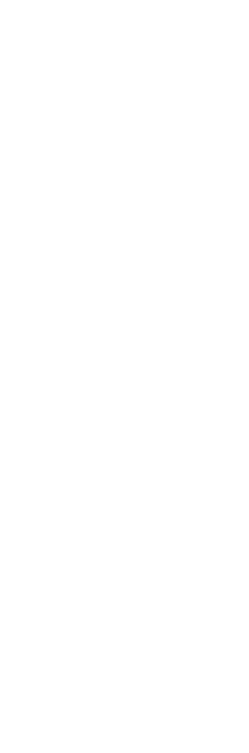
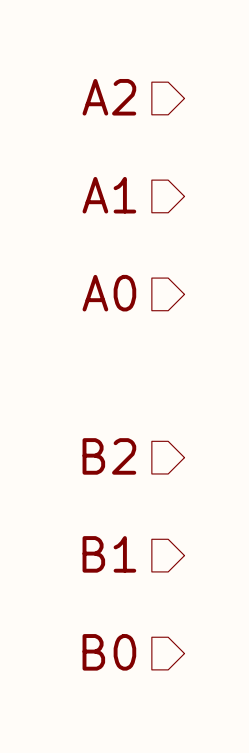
hierarchical label: none -> A2 (109, 97)
hierarchical label: none -> A1 (109, 195)
hierarchical label: none -> A0 (109, 293)
hierarchical label: none -> B2 (109, 456)
hierarchical label: none -> B1 (109, 554)
hierarchical label: none -> B0 (109, 652)

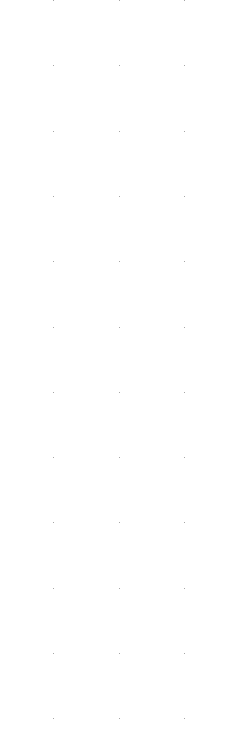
hierarchical label: A2 (109, 97) -> none
hierarchical label: A1 (109, 195) -> none
hierarchical label: A0 (109, 293) -> none
hierarchical label: B2 (109, 456) -> none
hierarchical label: B1 (109, 554) -> none
hierarchical label: B0 (109, 652) -> none

